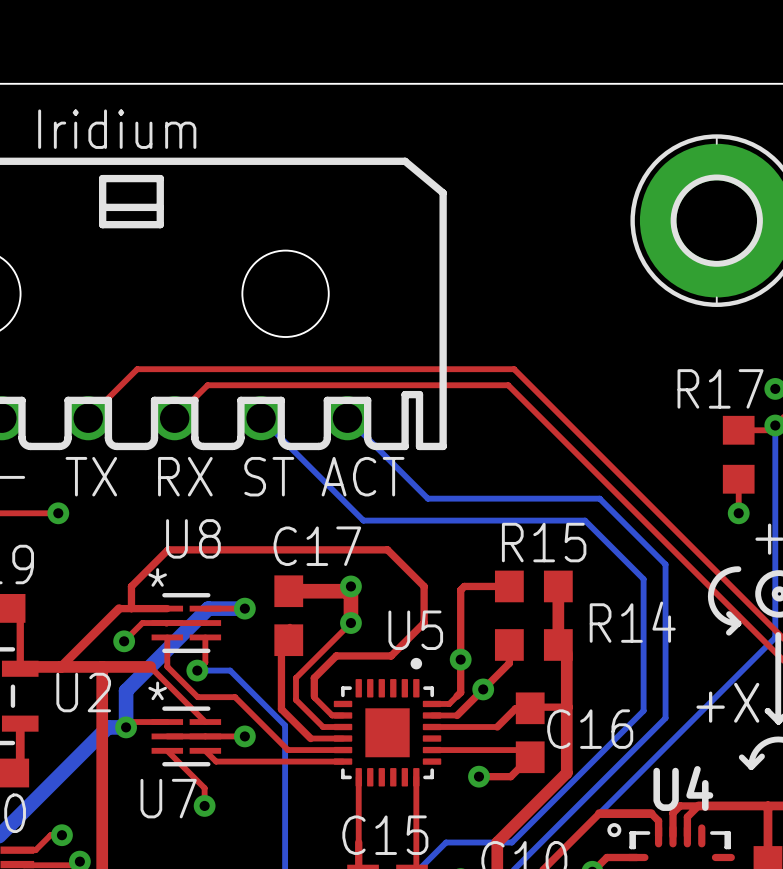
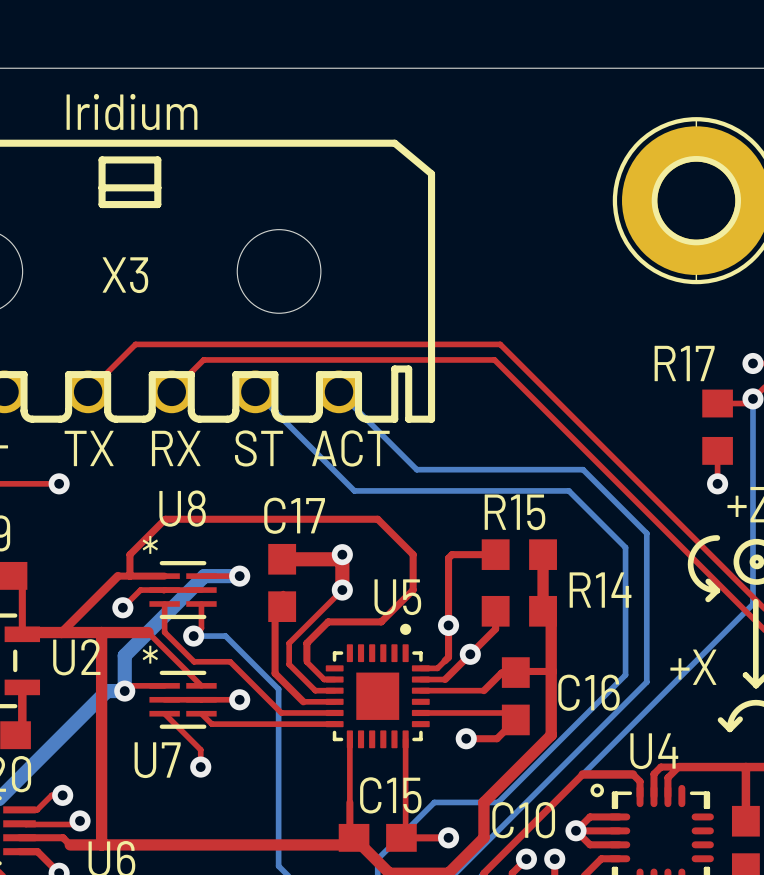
text: none -> X3 (125, 275)

